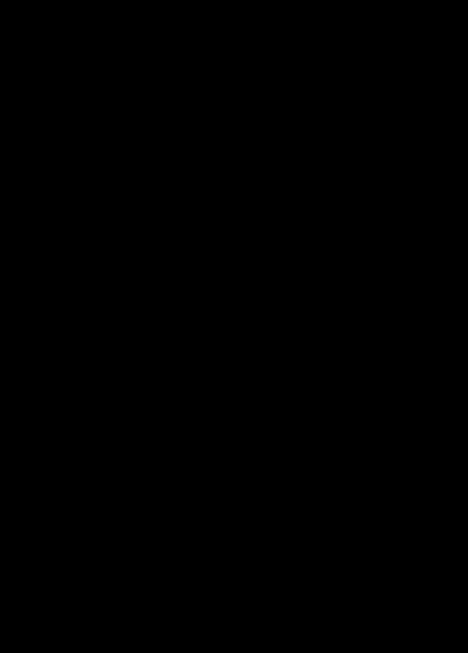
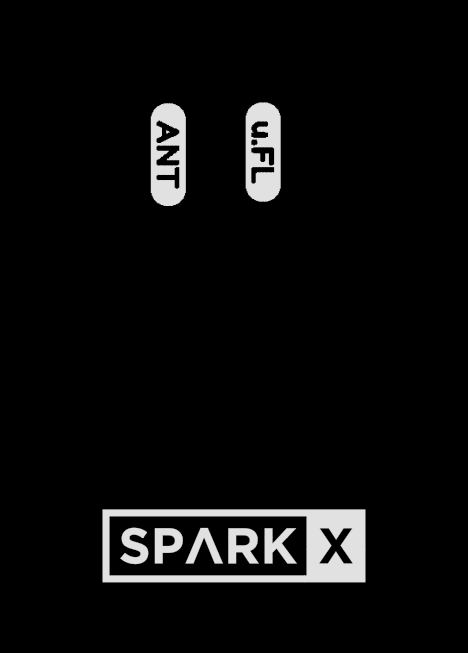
drawing: none -> [245, 102, 281, 202]
drawing: none -> [150, 103, 186, 206]
drawing: none -> [102, 509, 366, 583]

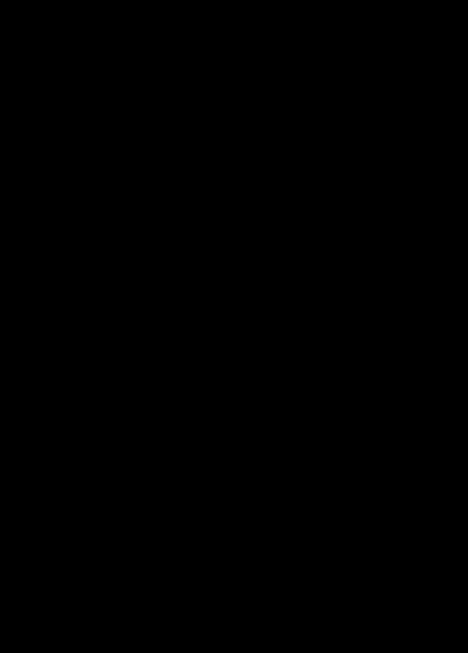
drawing: [245, 102, 281, 202] -> none
drawing: [150, 103, 186, 206] -> none
drawing: [102, 509, 366, 583] -> none

